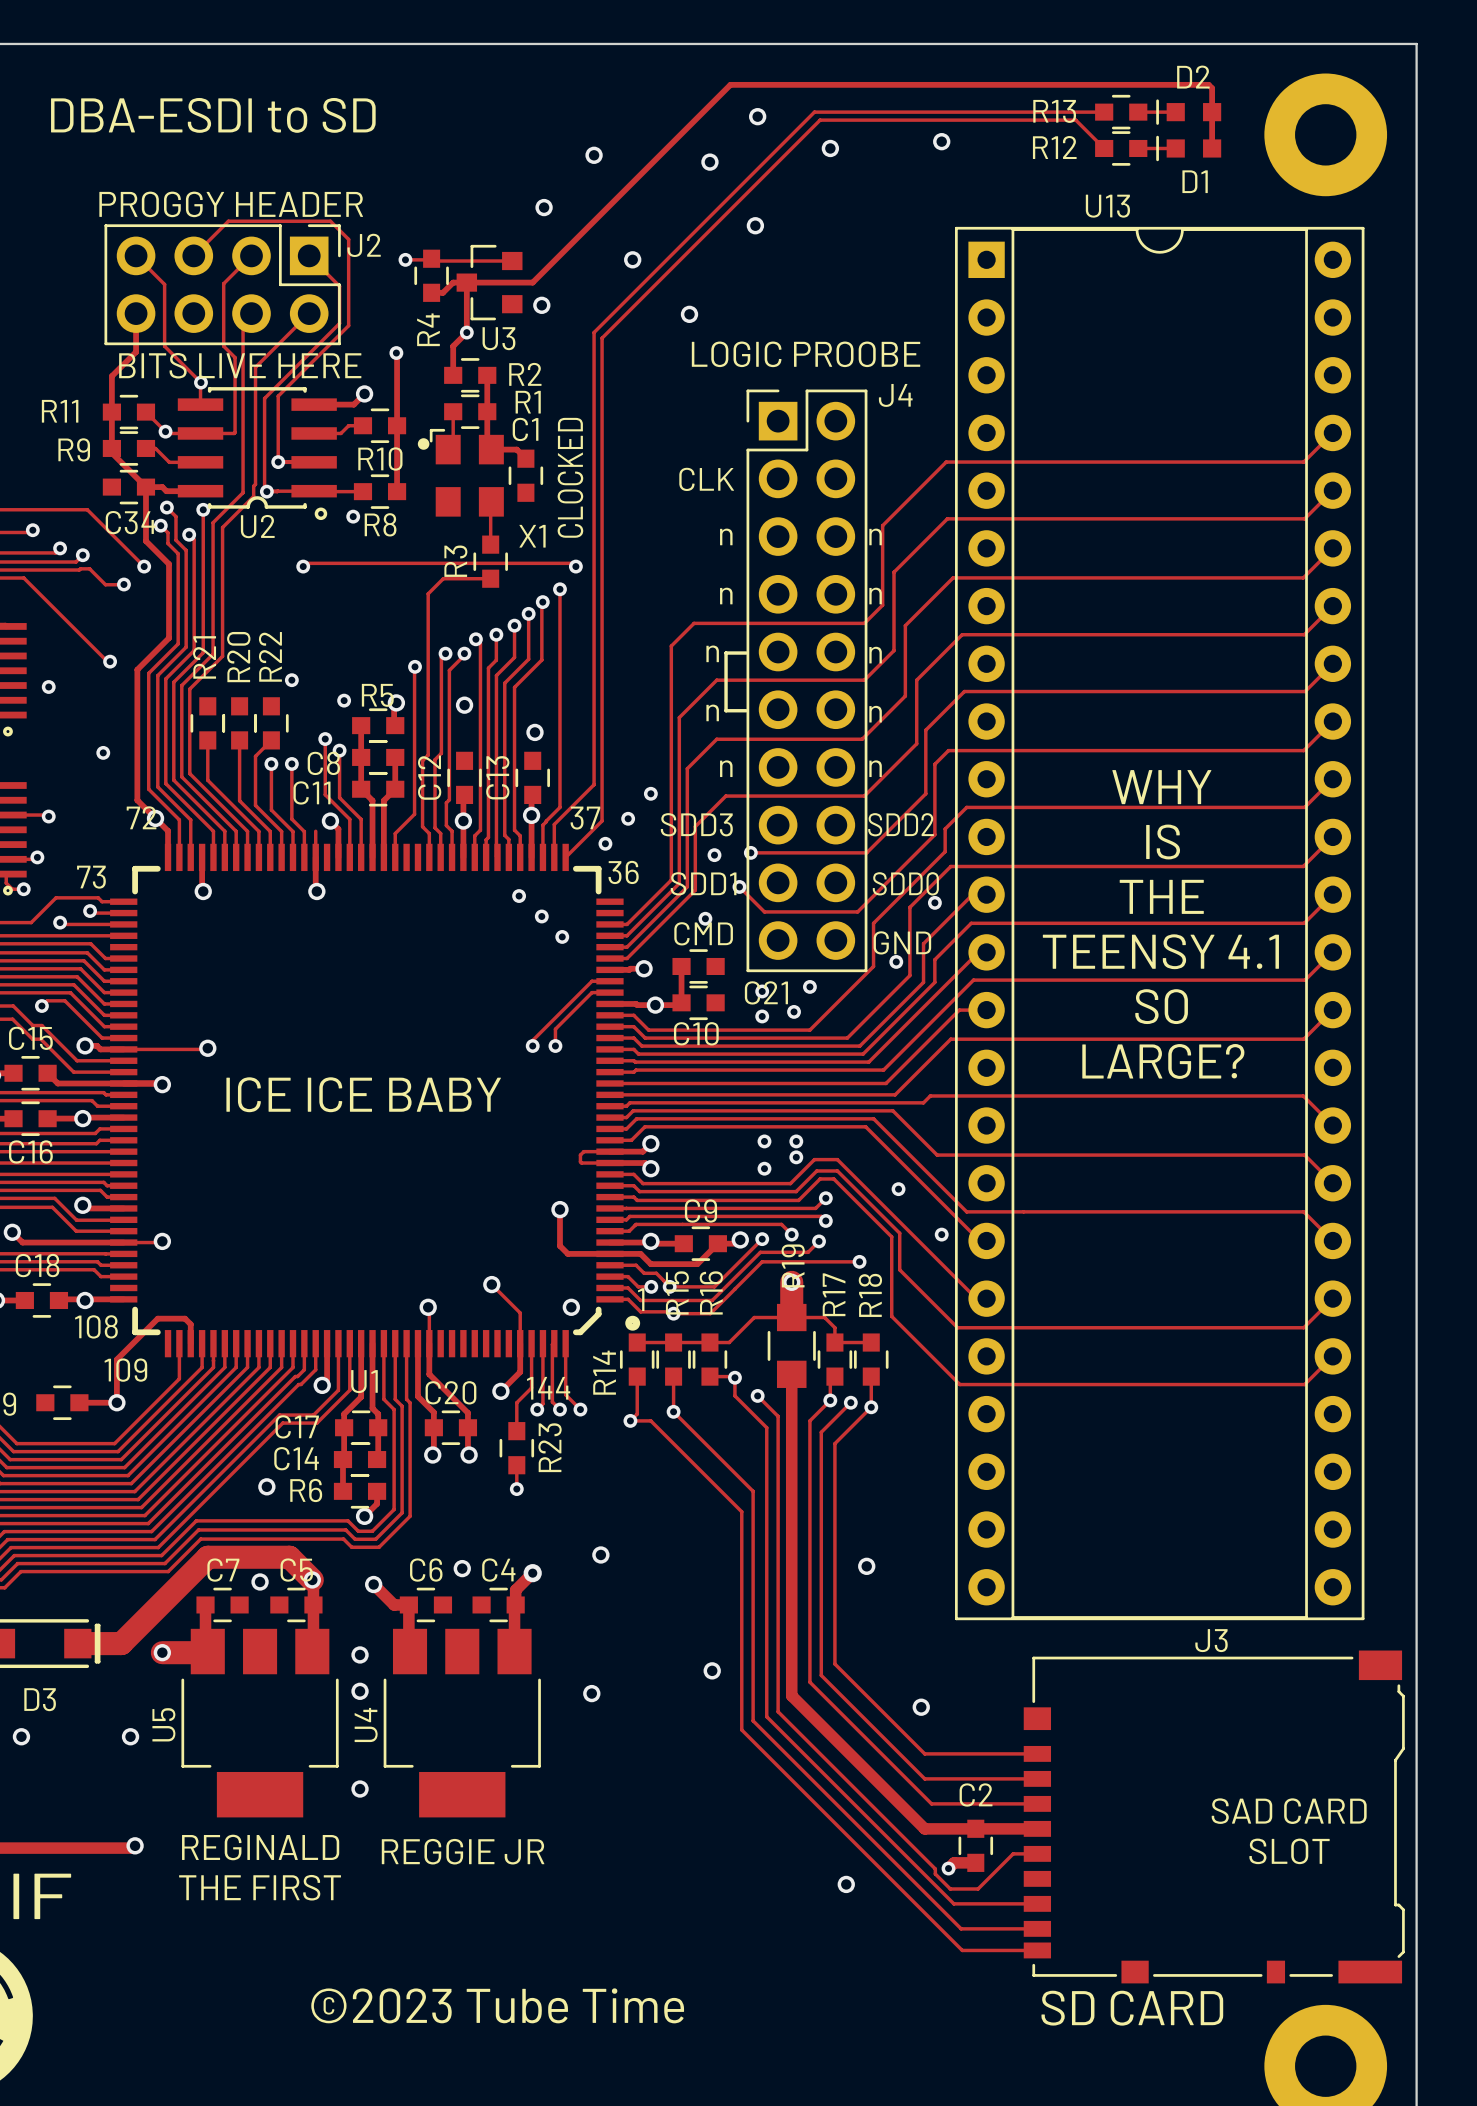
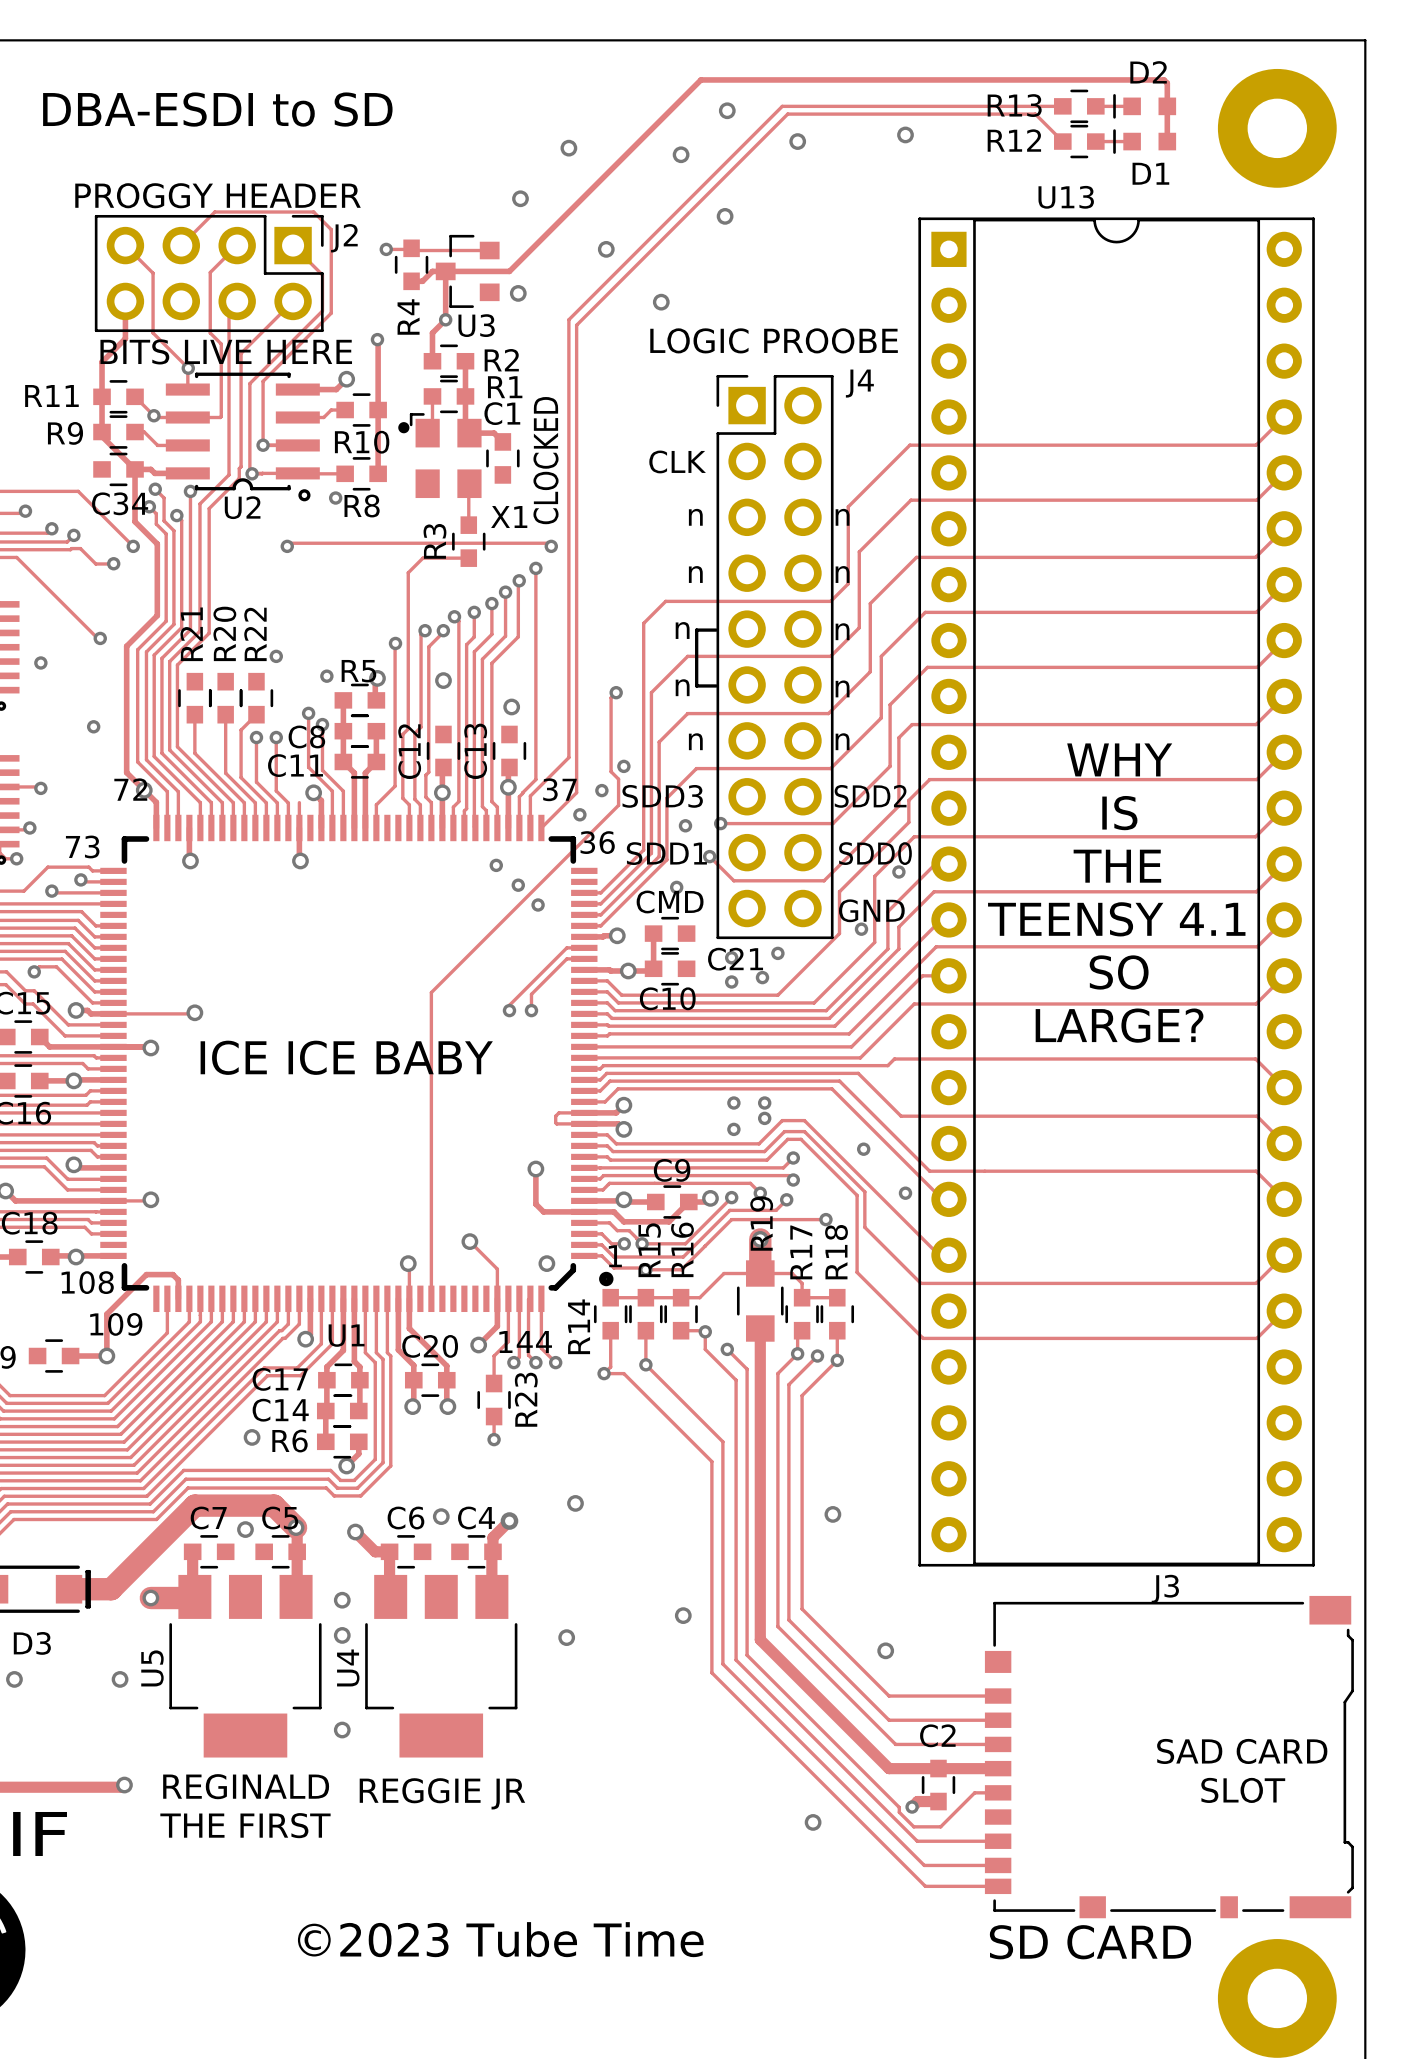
track: none -> (616, 692) (611, 697) (611, 771) (618, 779) (618, 805) (431, 992) (431, 1298)
via: none -> (616, 692)

